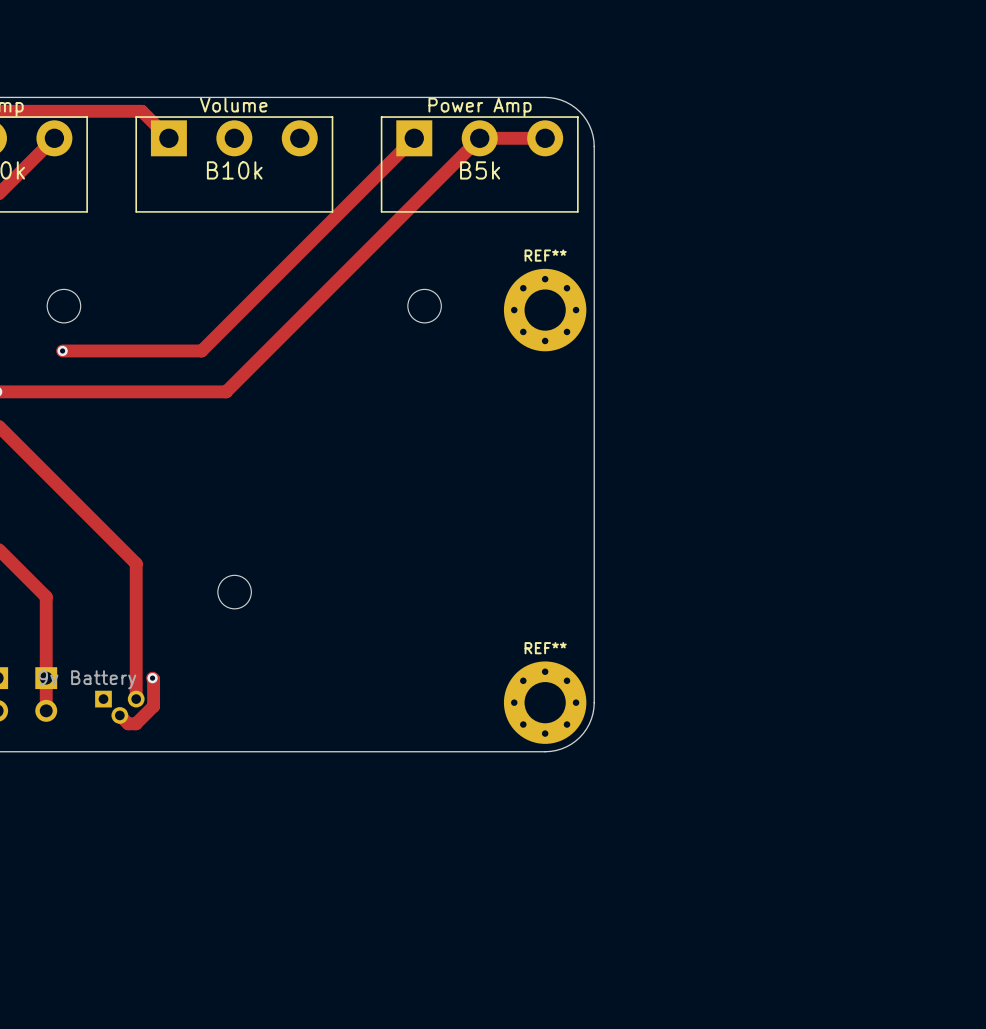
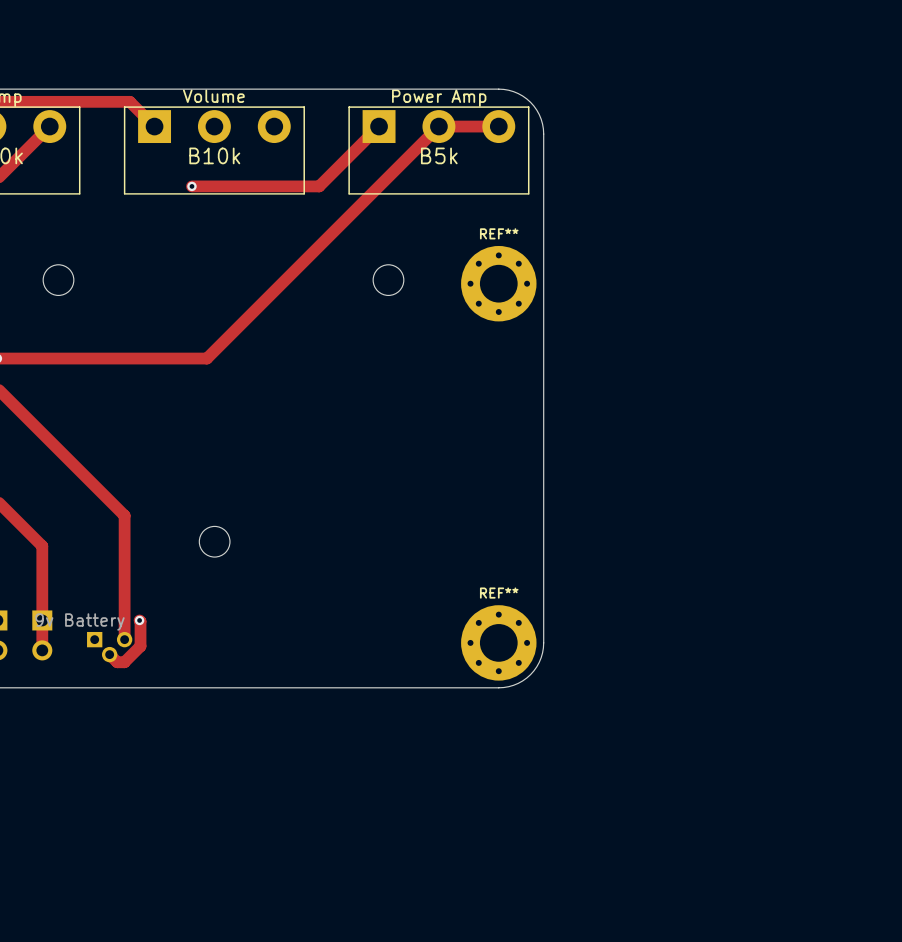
via: none -> (191, 186)
track: (348, 203) (201, 350) (62, 350) -> (319, 186) (191, 186)
via: (62, 350) -> none

